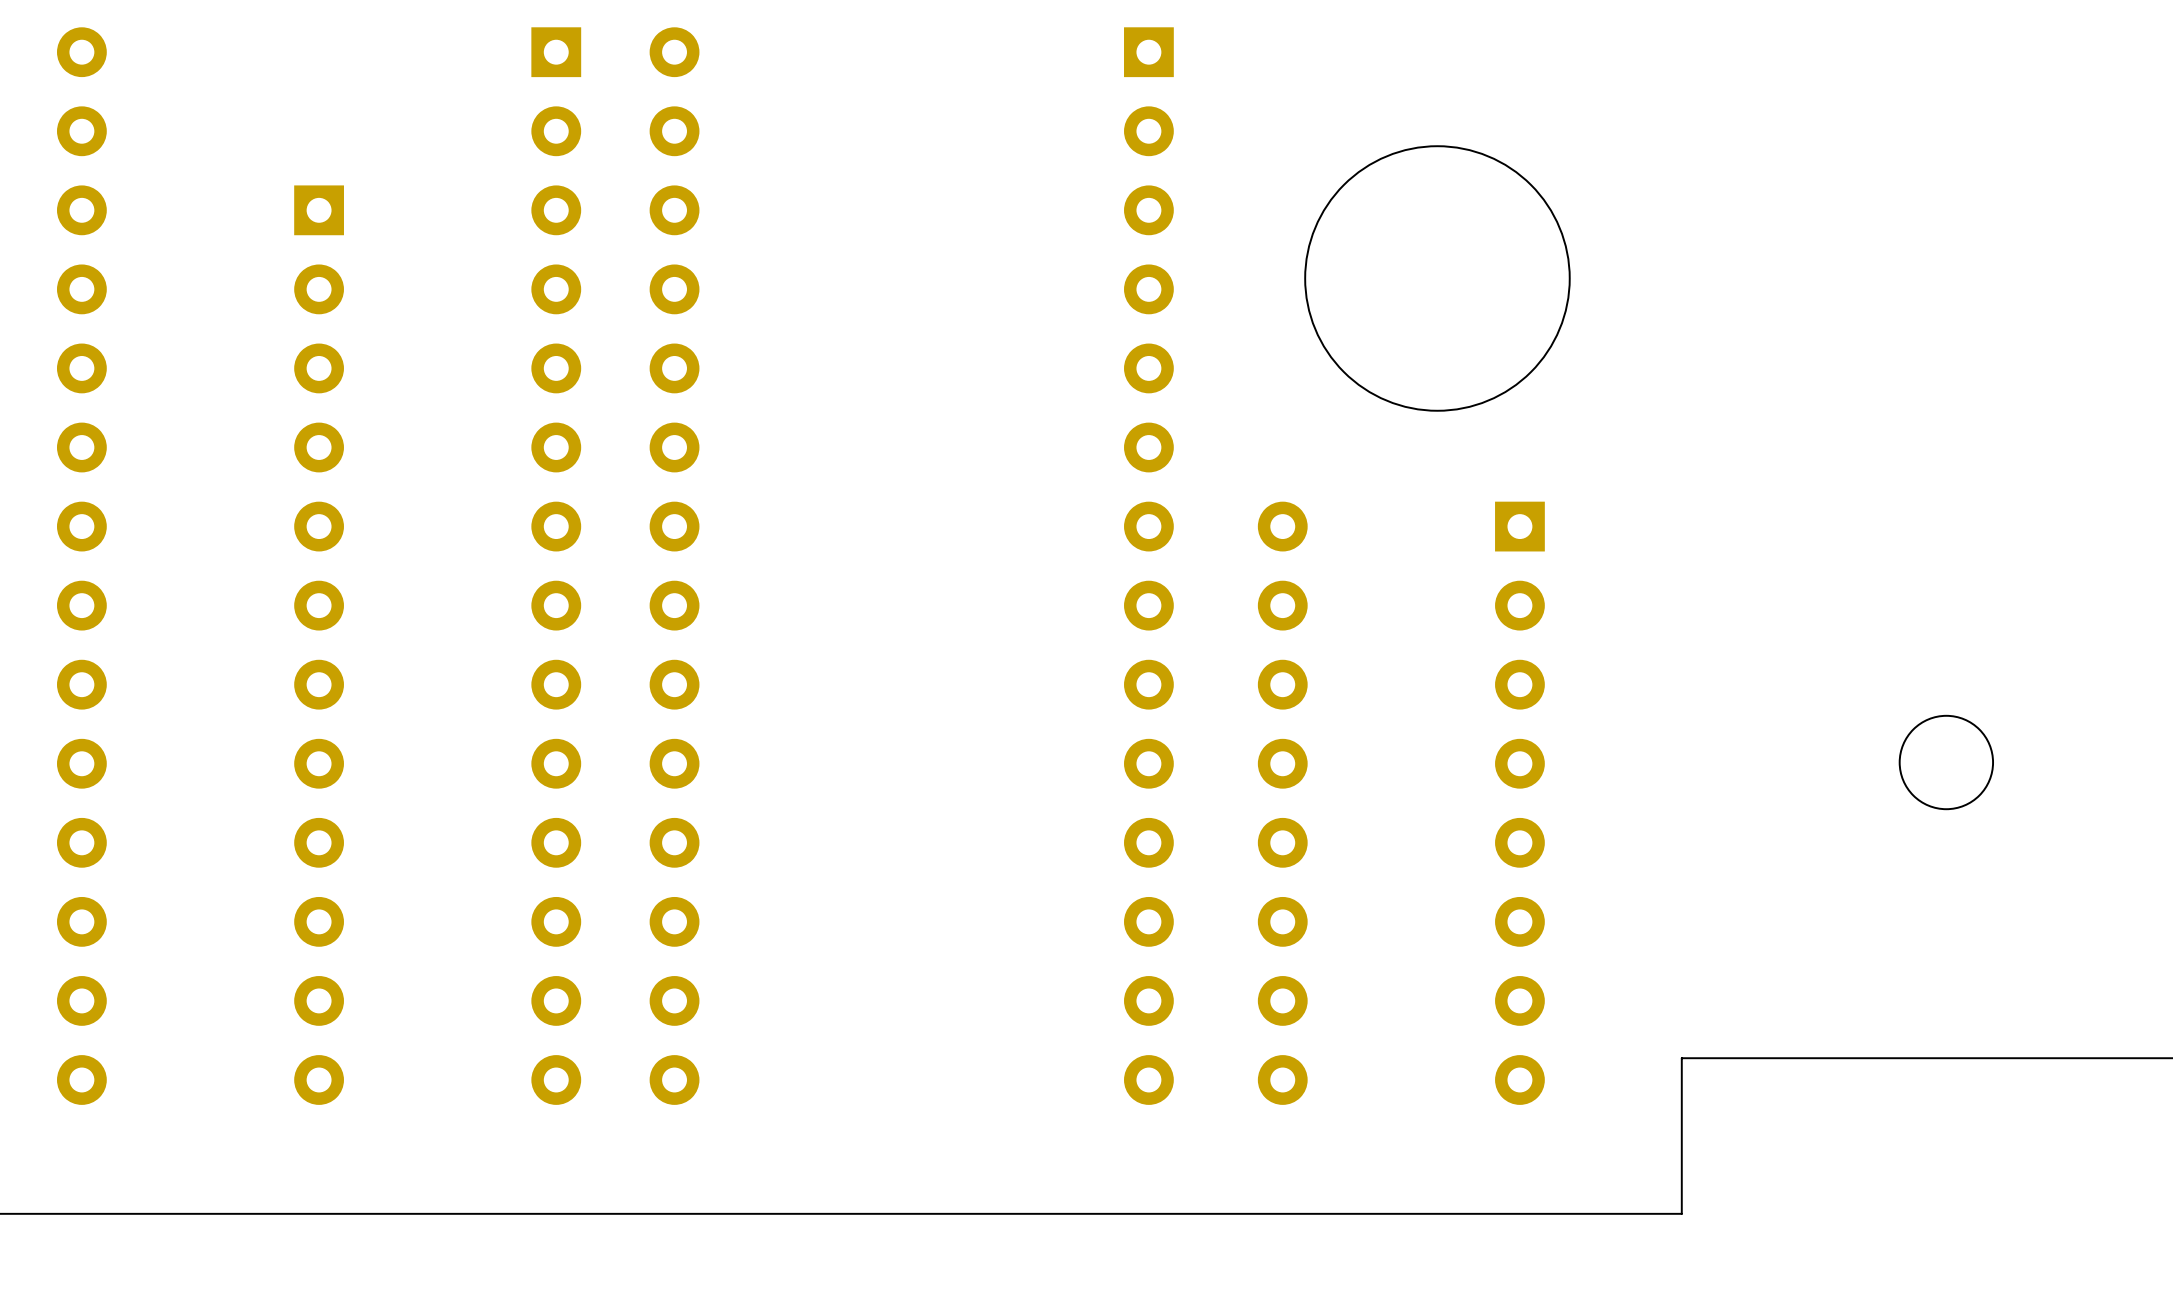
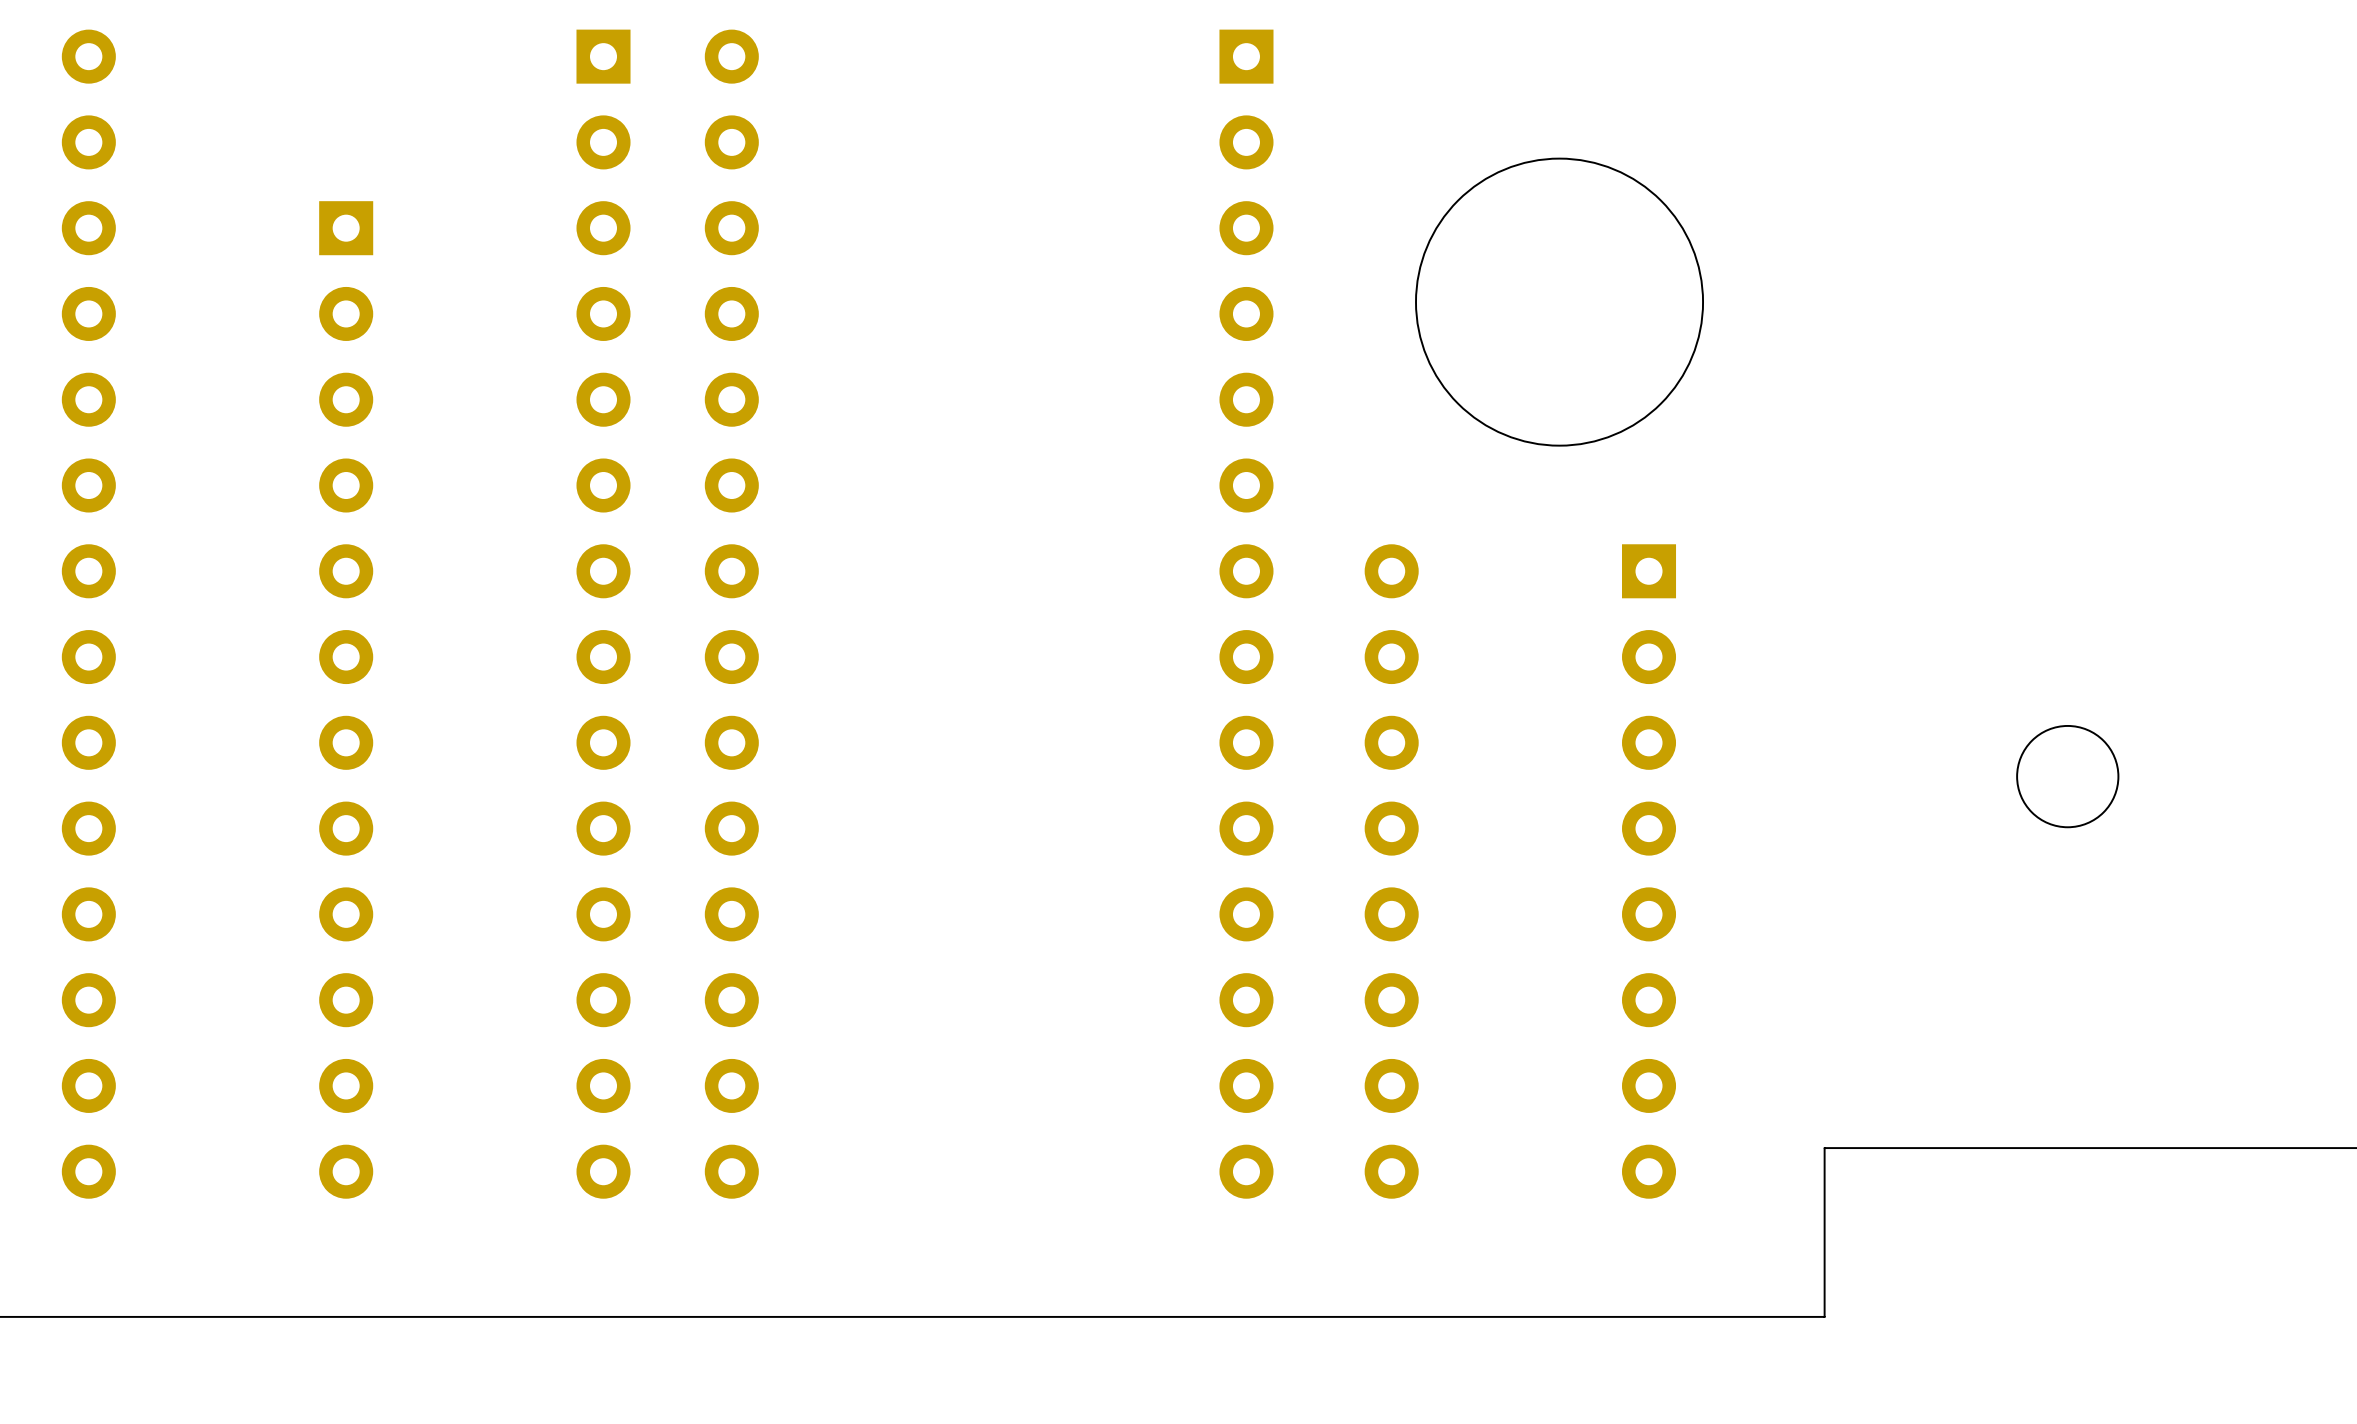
round board edge position: (1946, 762) -> (2067, 776)

